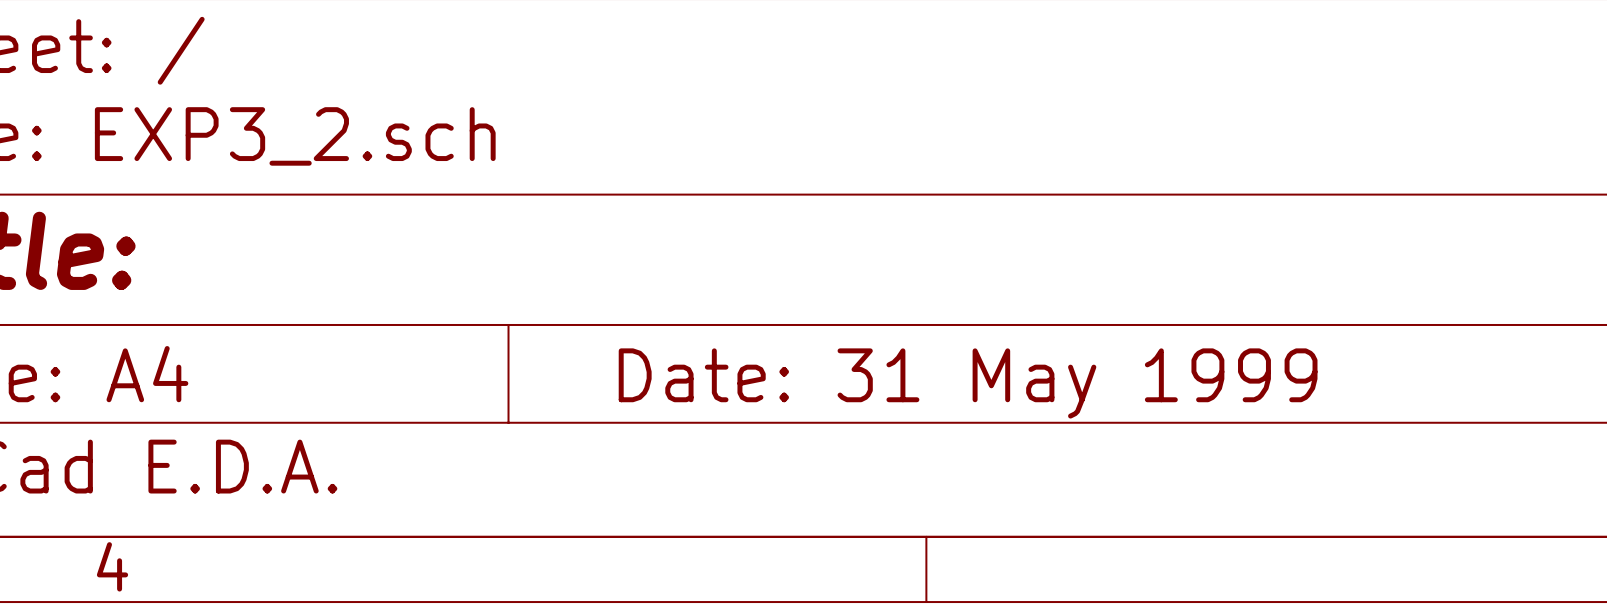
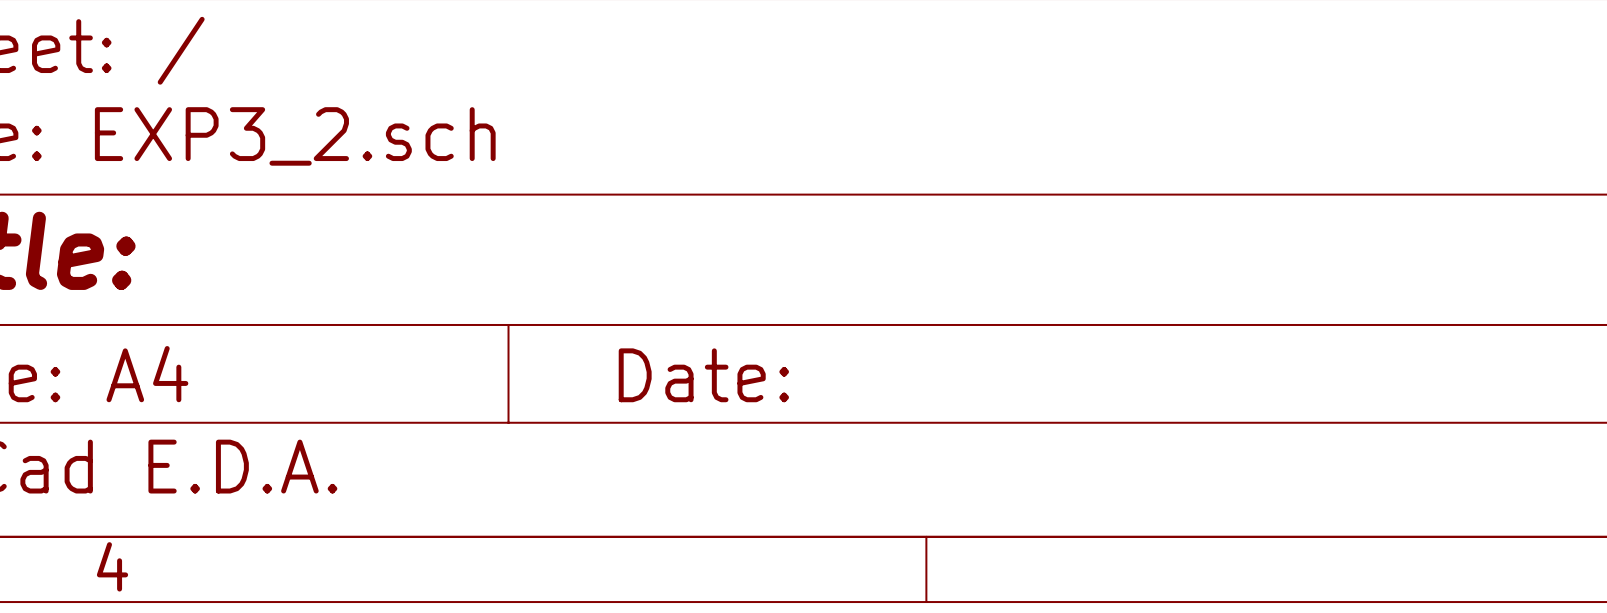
title block: Date: 31 May 1999 (968, 383) -> Date: (703, 375)

